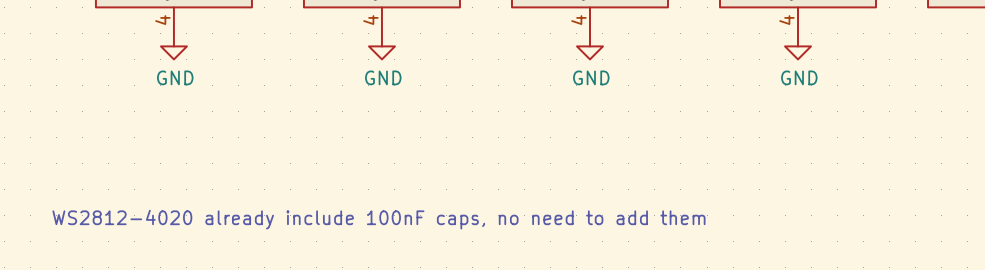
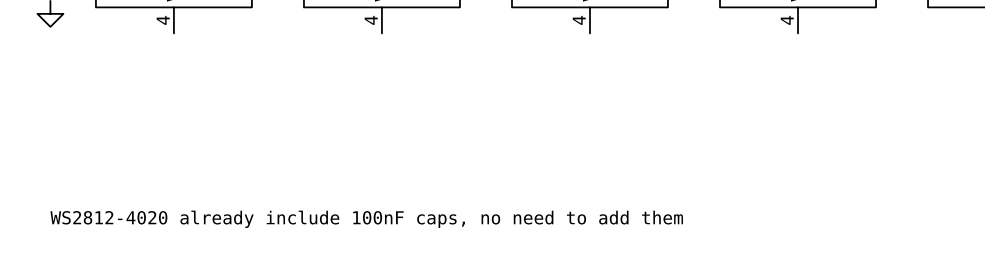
power symbol: none -> (50, 13)
power symbol: GND (173, 46) -> none
power symbol: GND (381, 46) -> none
power symbol: GND (589, 46) -> none
power symbol: GND (798, 46) -> none

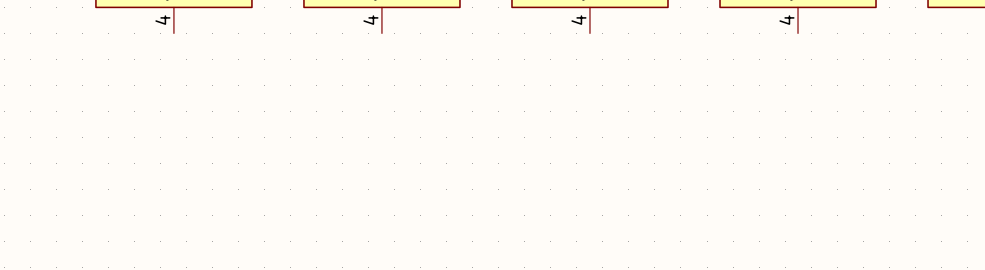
power symbol: (50, 13) -> none
text: WS2812-4020 already include 100nF caps, no need to add them (366, 219) -> none

